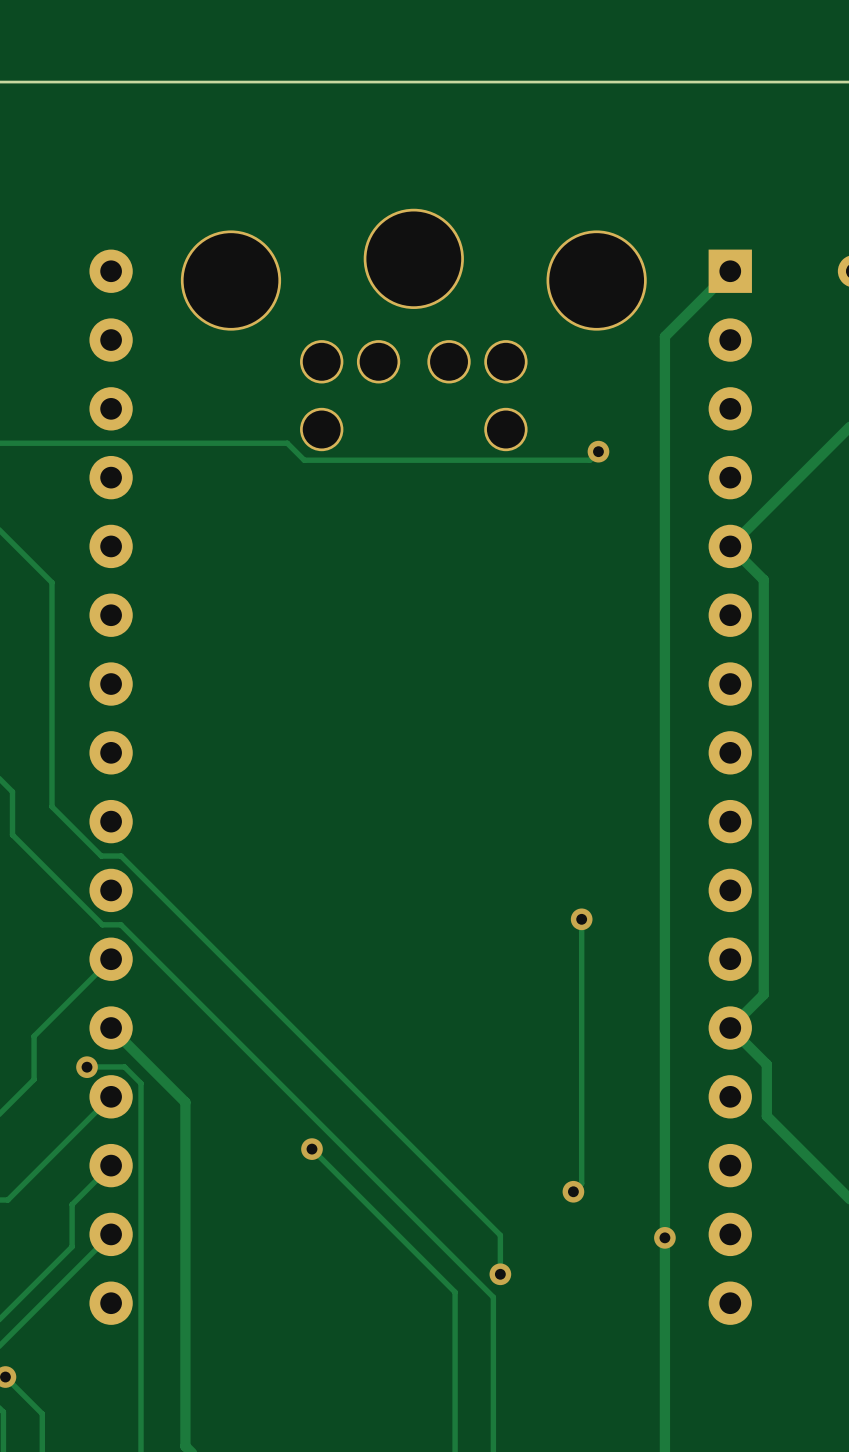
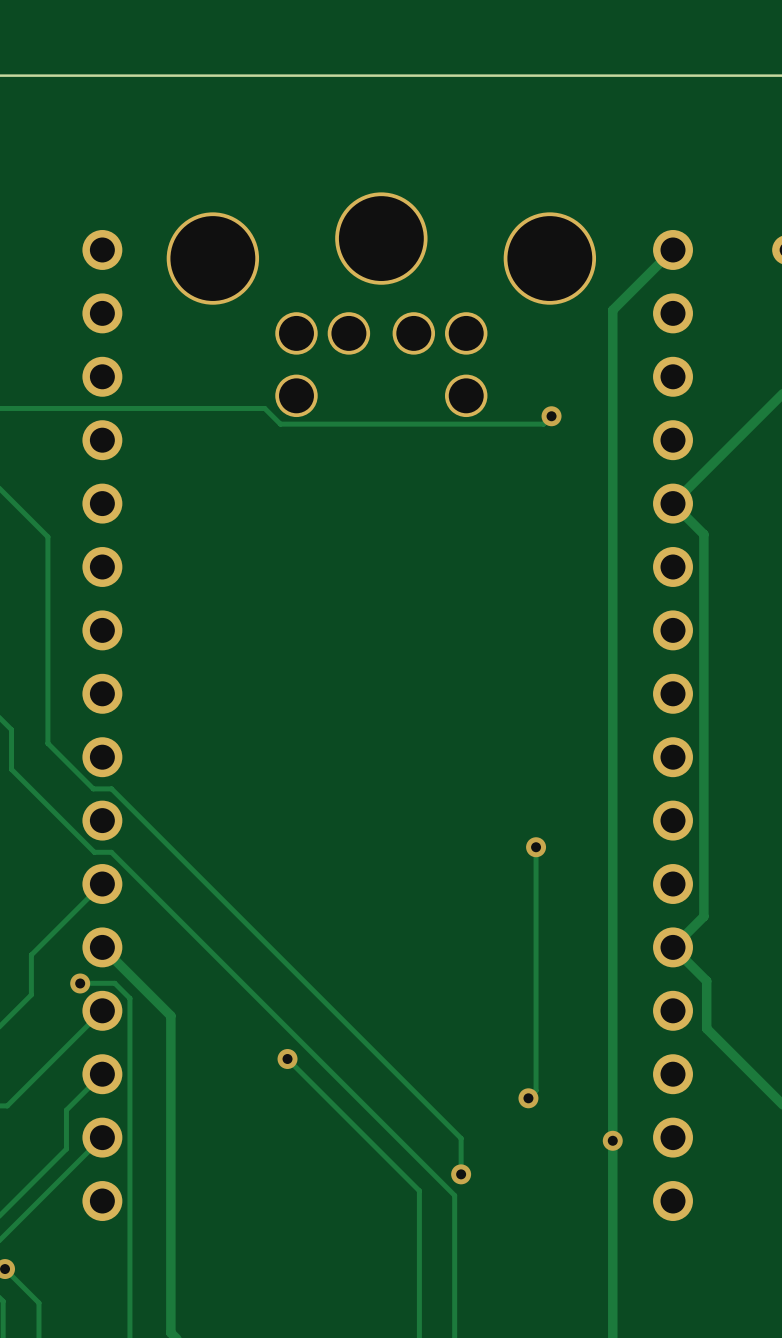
part footprint: [89, 208, 752, 1325] -> [82, 192, 693, 1221]

